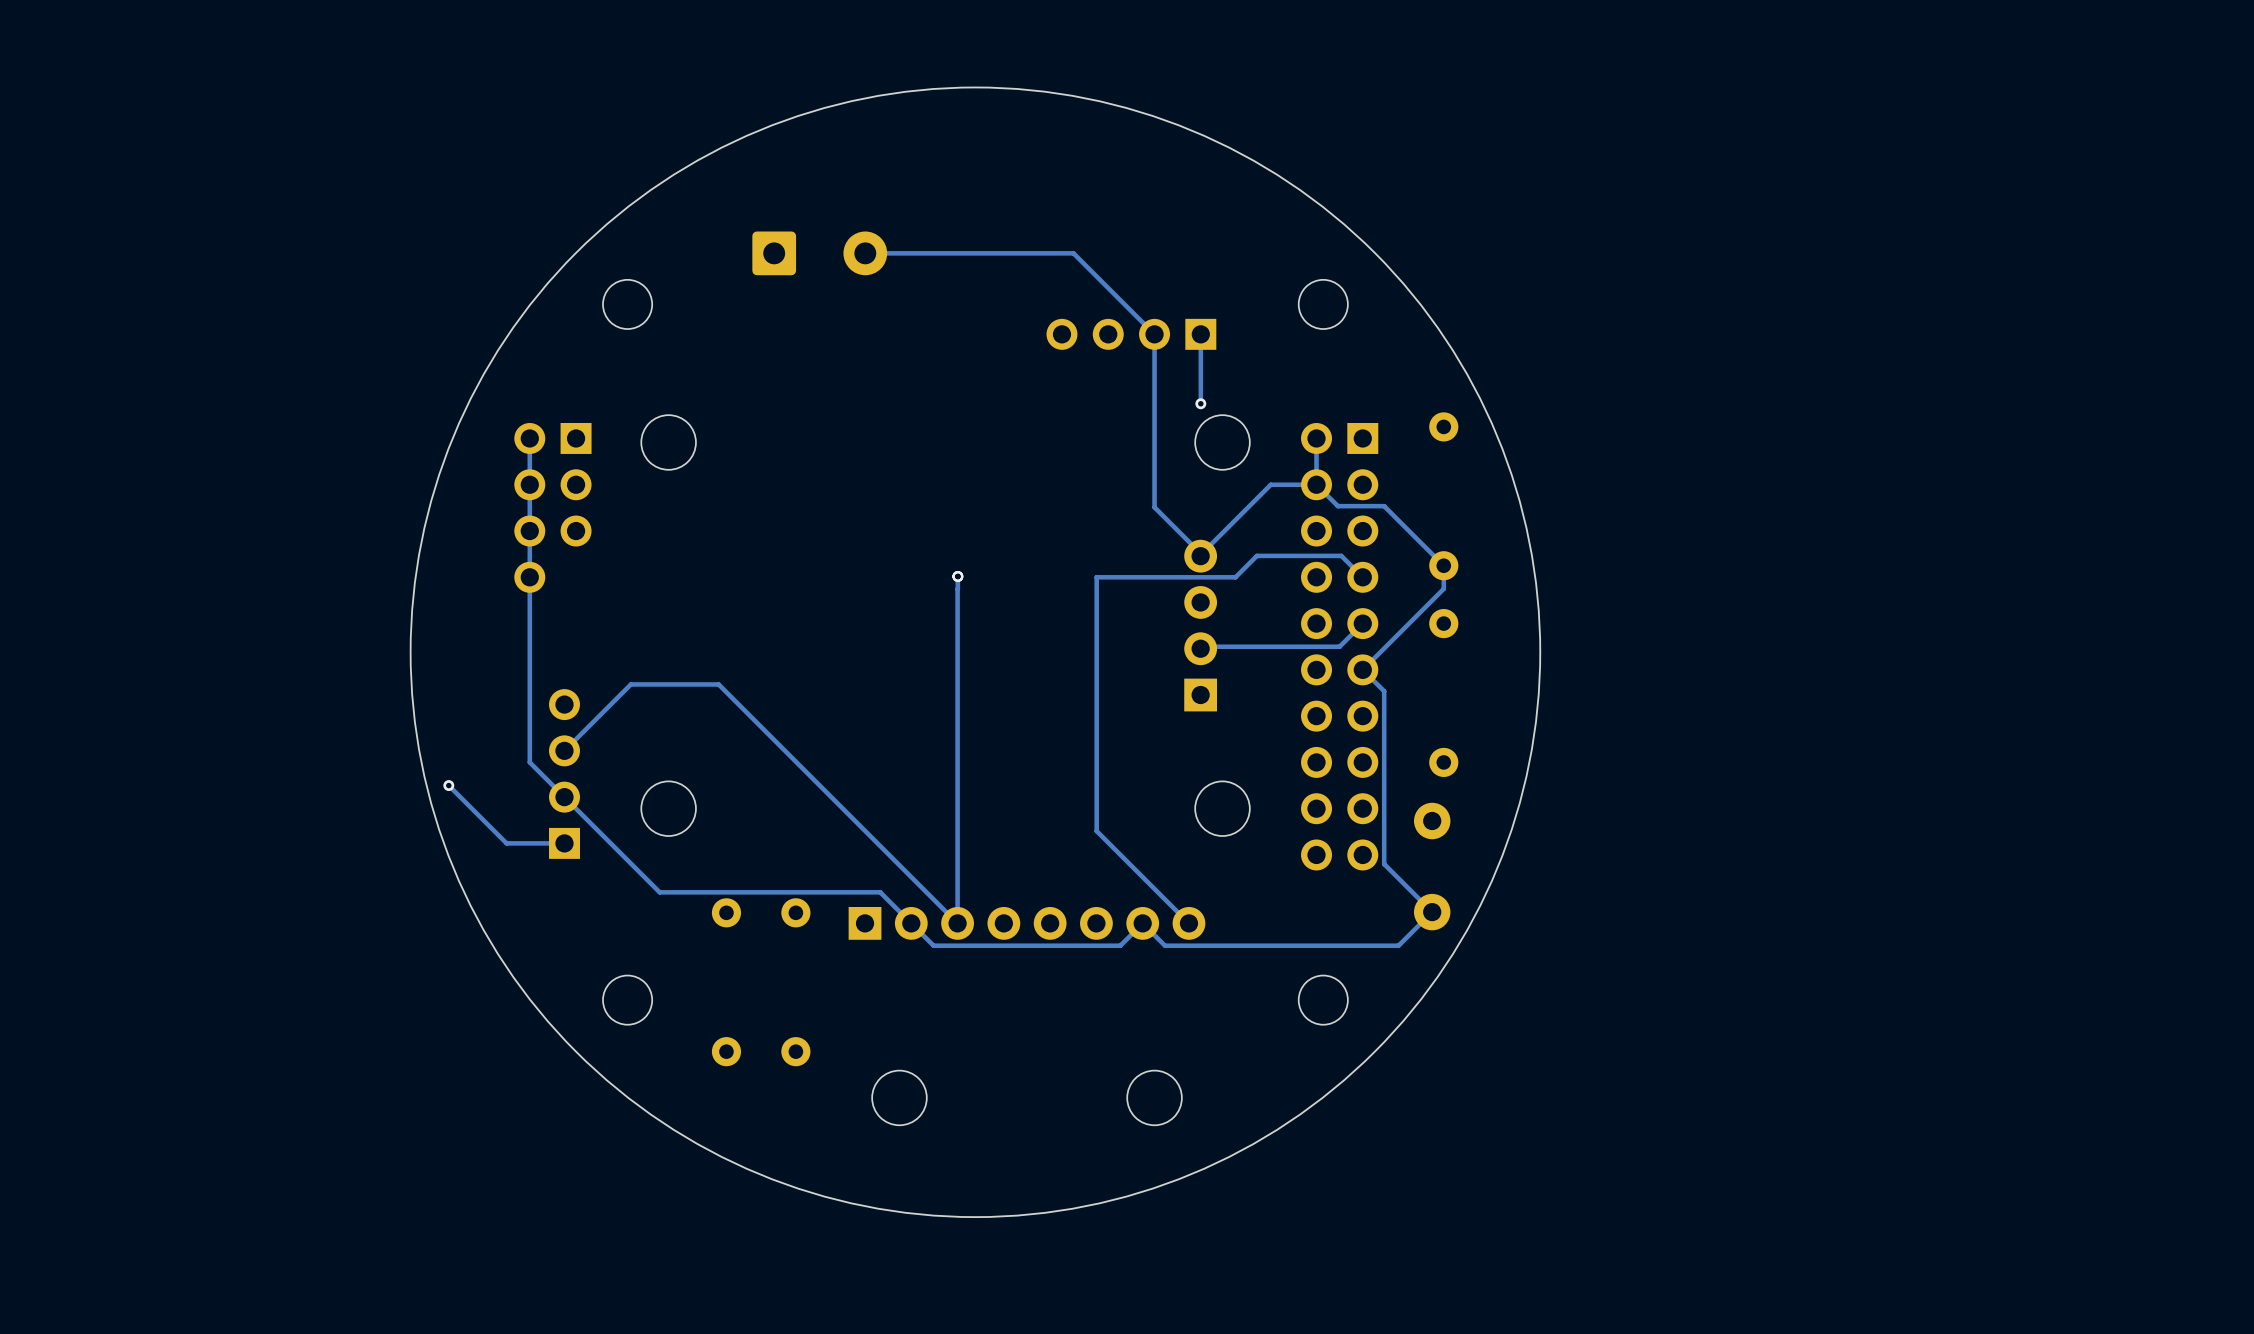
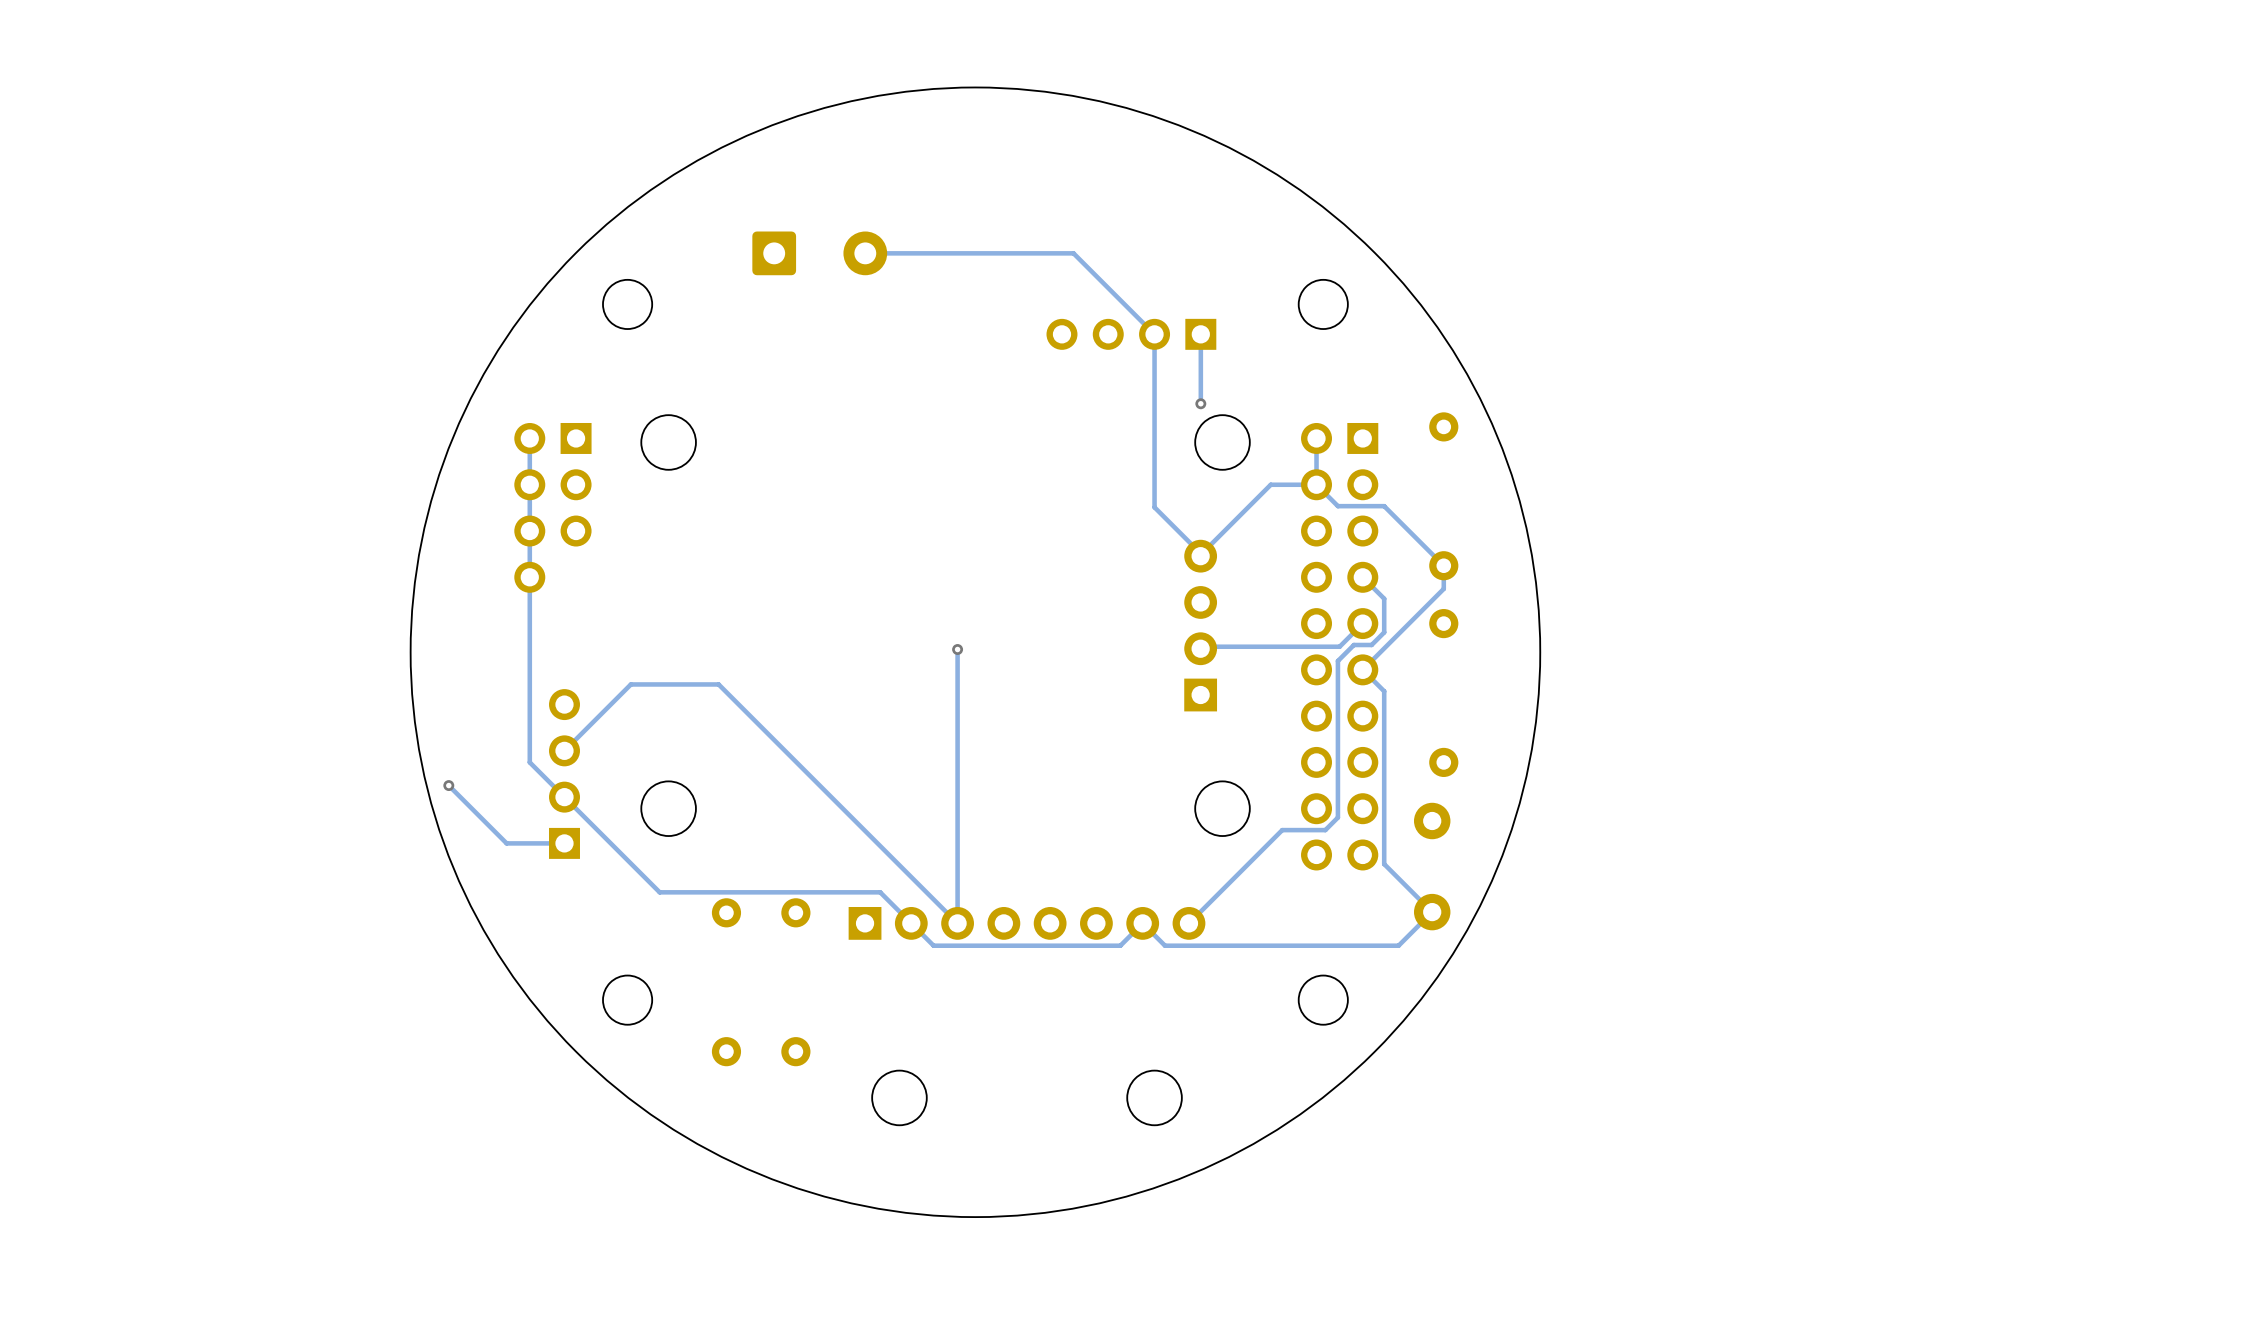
track: (957, 576) (957, 649) -> none
via position: (957, 576) -> (957, 649)
track: (1362, 577) (1341, 555) (1256, 555) (1235, 577) (1096, 577) (1096, 831) (1188, 923) -> (1362, 577) (1384, 598) (1384, 632) (1371, 644) (1353, 644) (1337, 661) (1337, 817) (1325, 830) (1282, 830) (1188, 923)

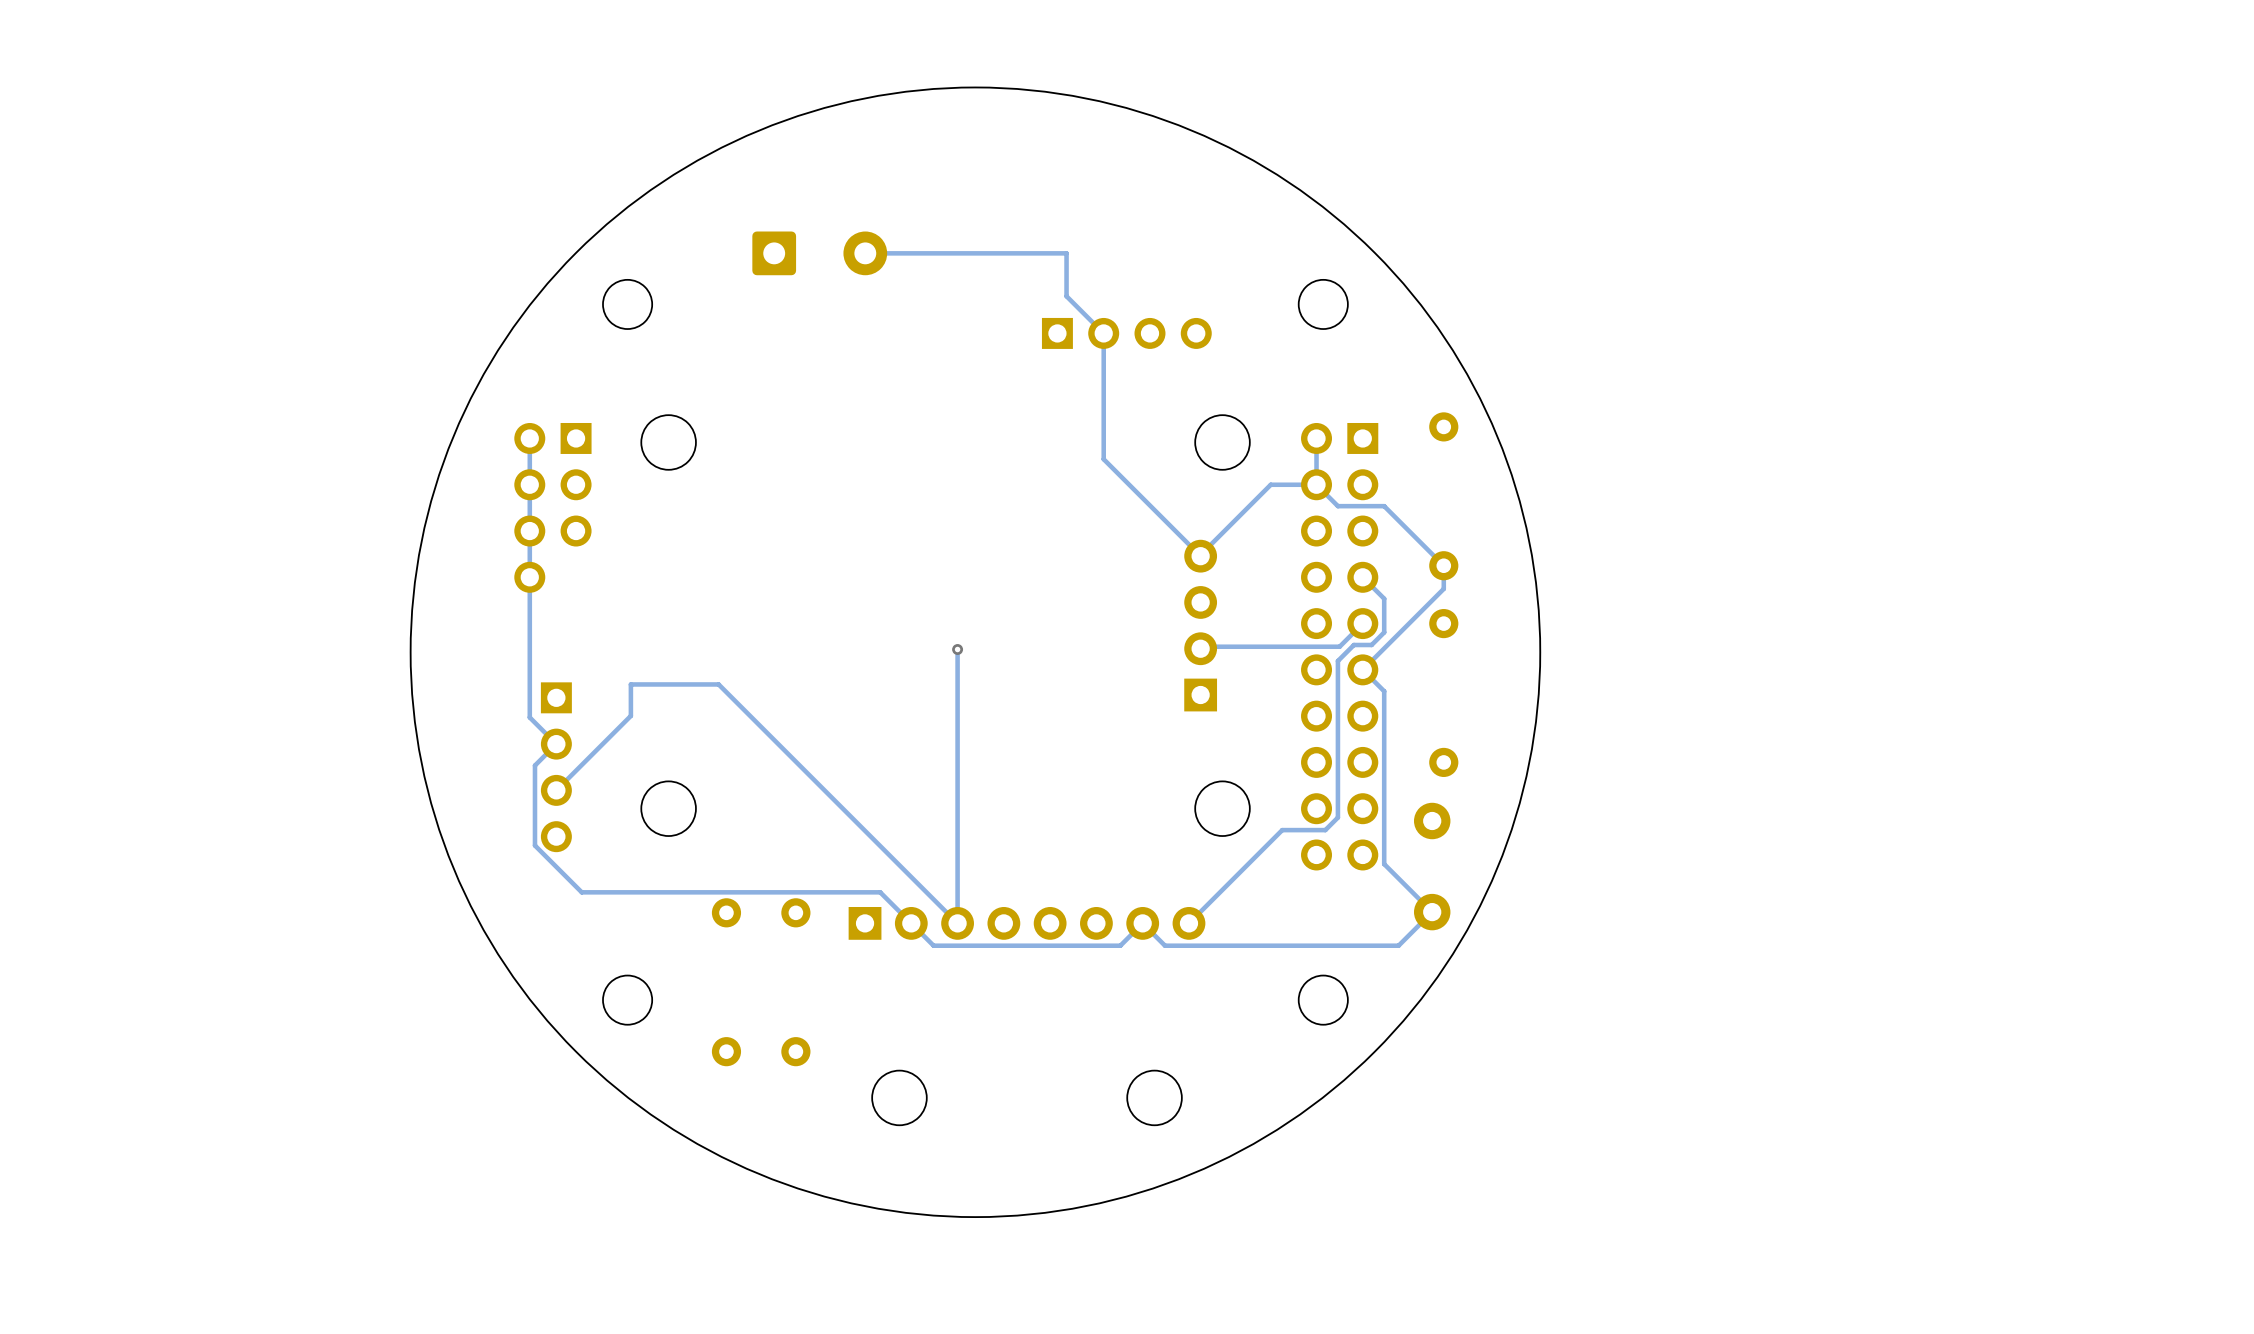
track: (1066, 253) (1073, 253) (1154, 334) (1154, 507) (1201, 554) -> (1066, 253) (1066, 296) (1103, 333) (1103, 459) (1200, 556)
part rotation: 0° (1131, 334) -> 180° (1126, 333)
track: (1200, 334) (1200, 403) -> none
via: (1200, 403) -> none
track: (630, 684) (564, 750) -> (630, 684) (630, 715) (556, 790)
track: (529, 717) (529, 762) (659, 892) -> (529, 717) (556, 744) (534, 765) (534, 845) (581, 892) (659, 892)
part rotation: 0° (564, 773) -> 180° (556, 767)
track: (448, 785) (506, 843) (564, 843) -> none
via: (448, 785) -> none

